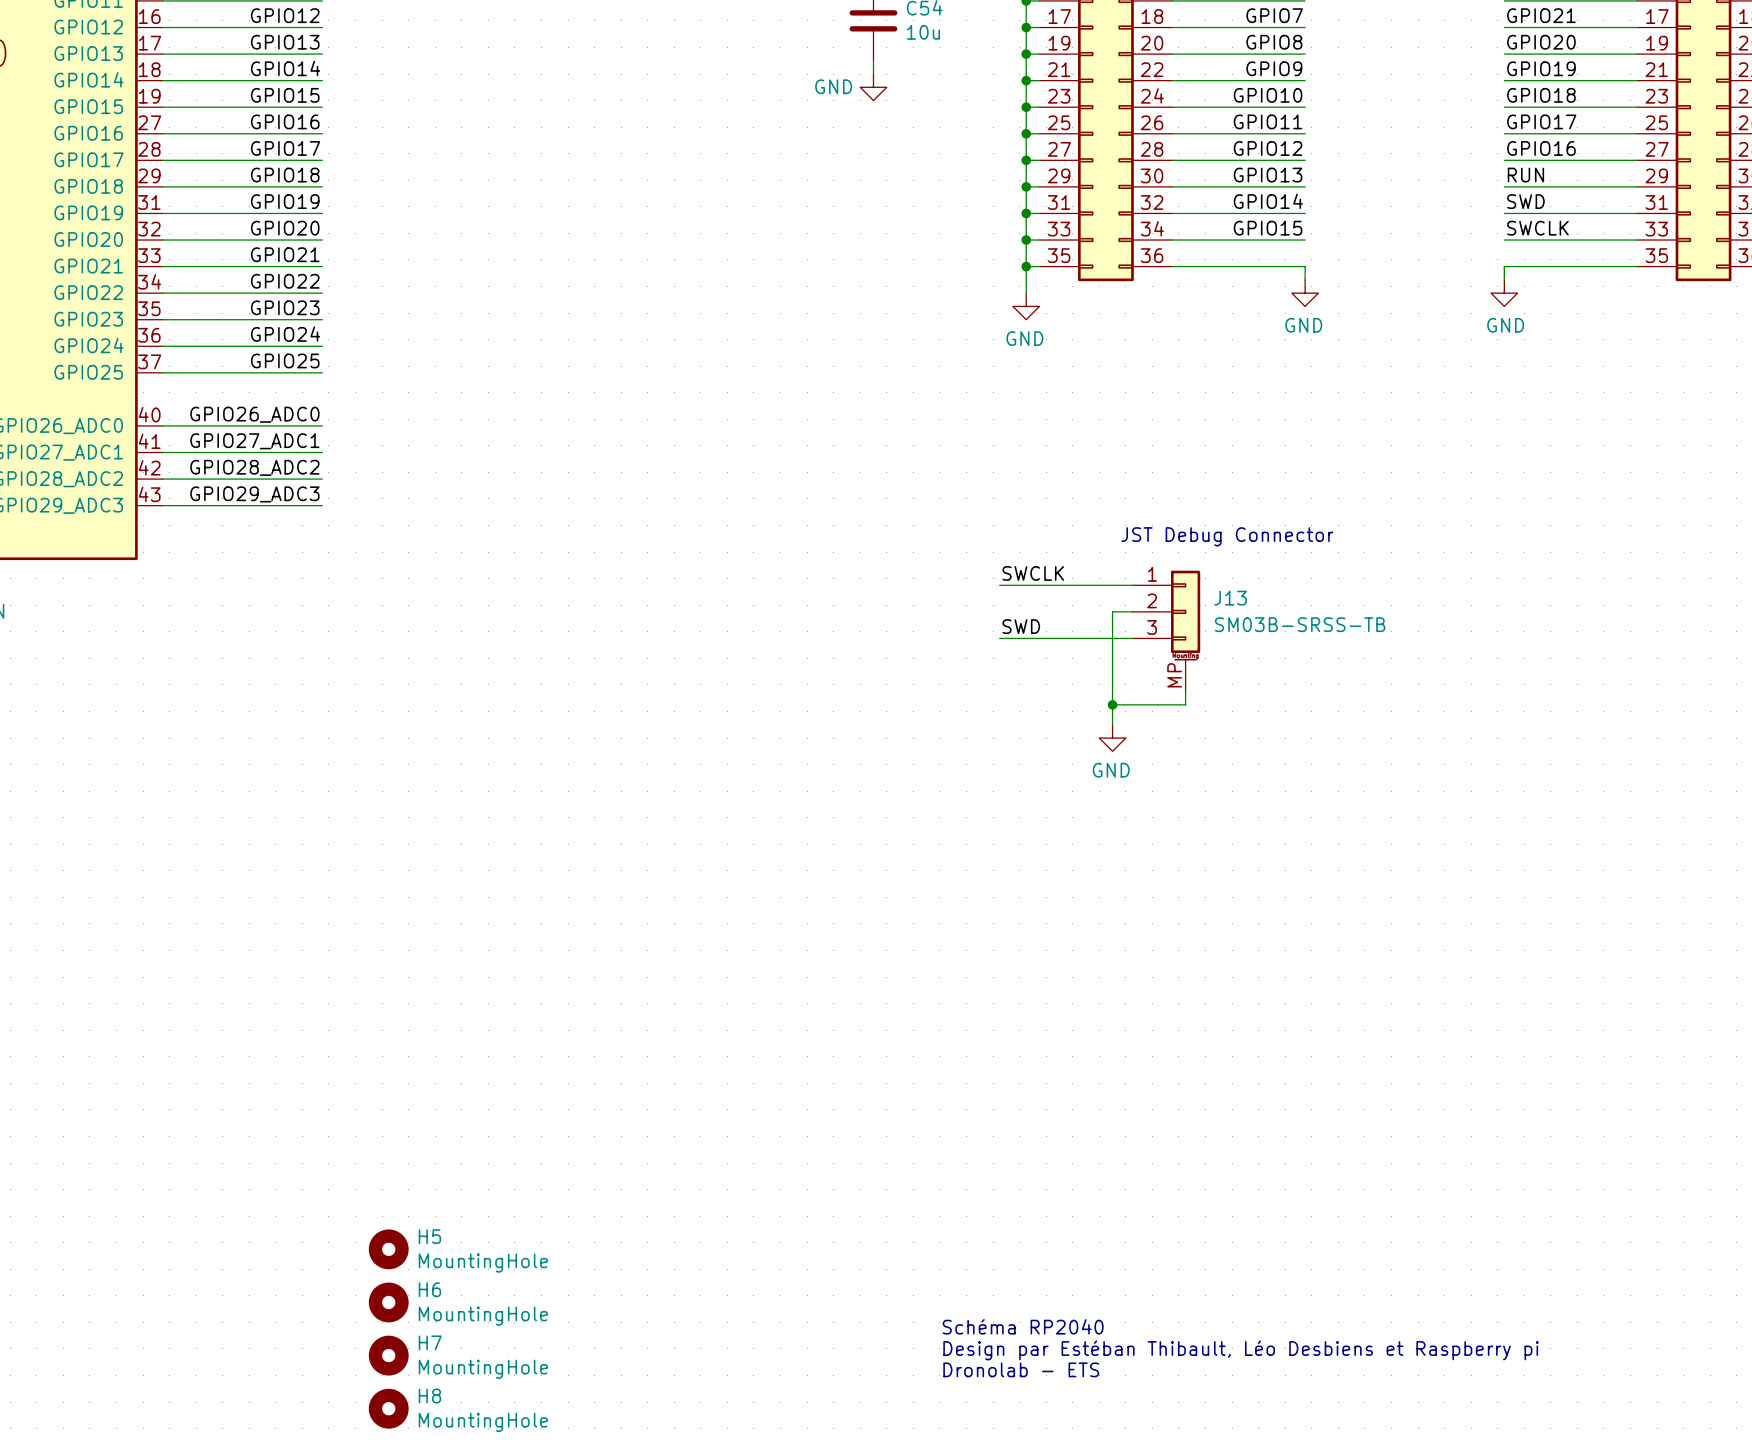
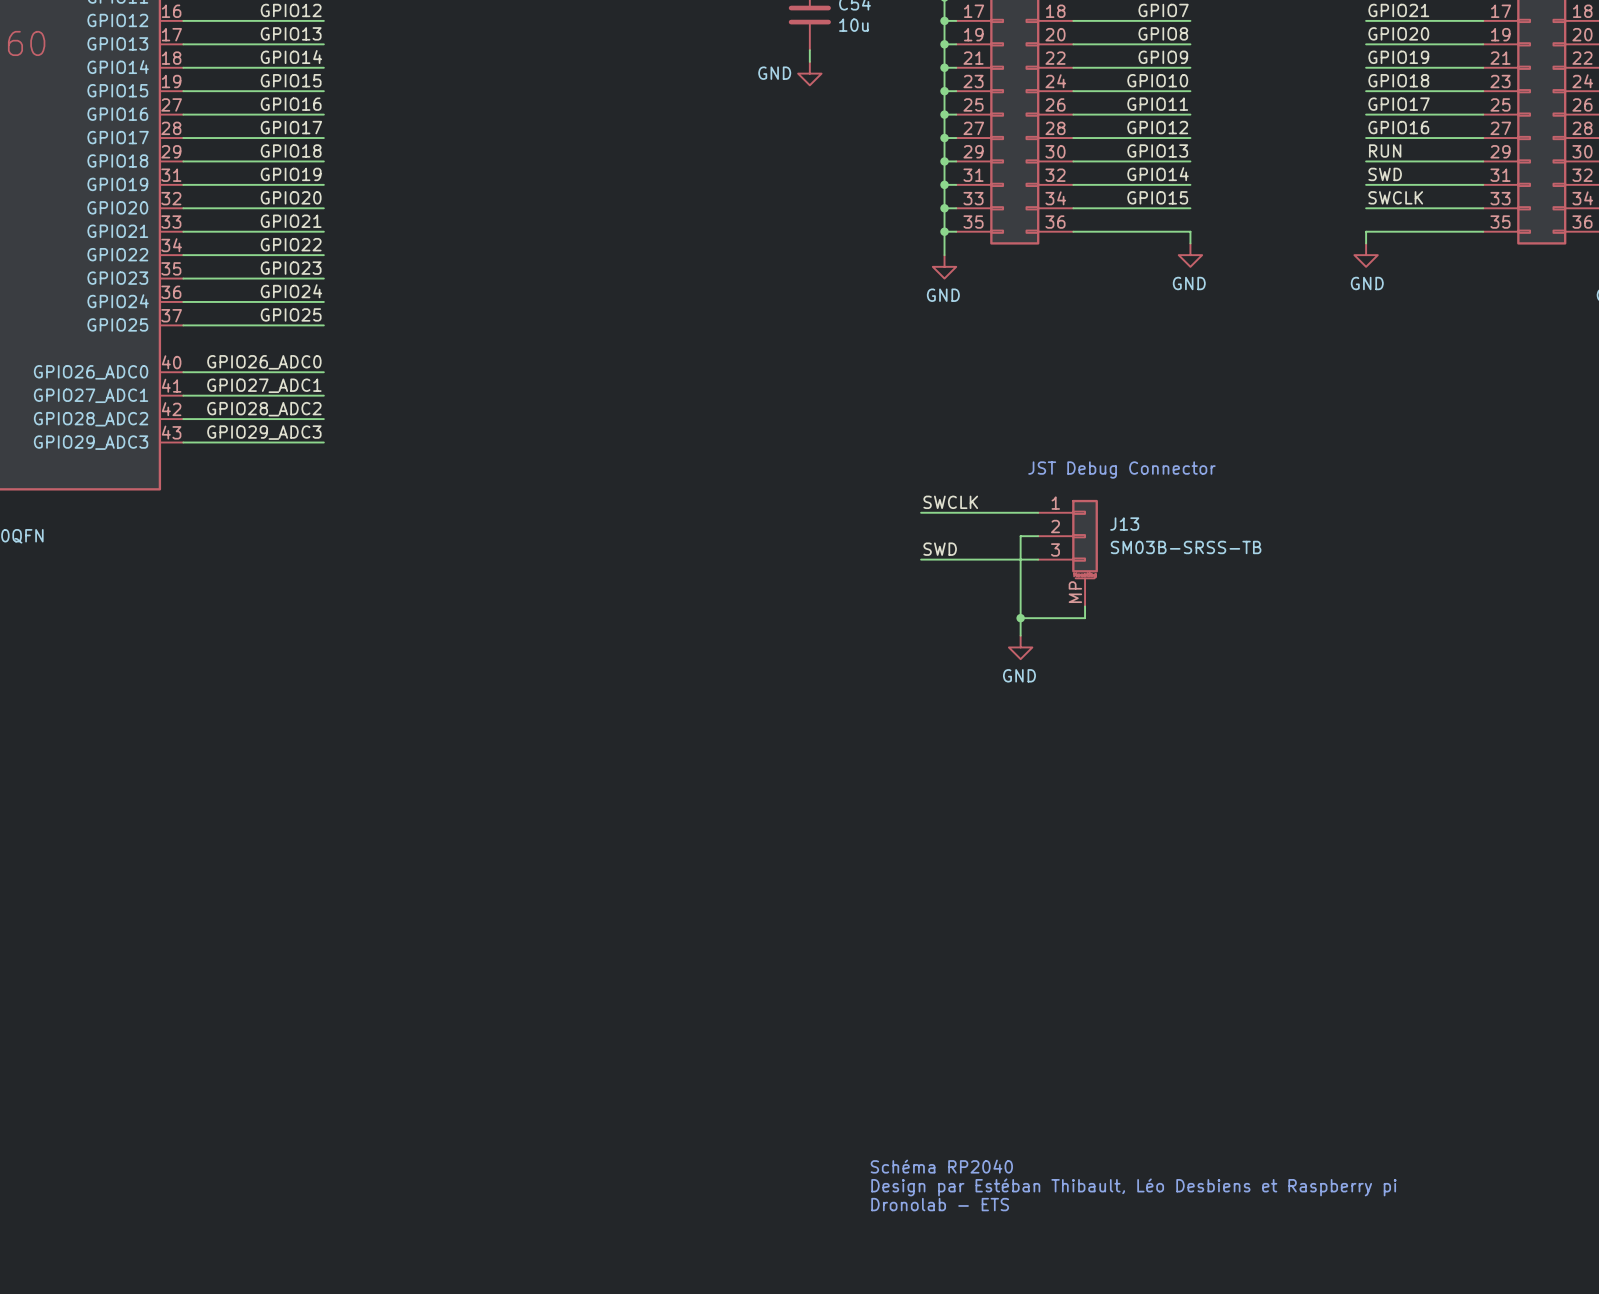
H5: MountingHole (388, 1249) -> none
H6: MountingHole (388, 1302) -> none
H7: MountingHole (388, 1355) -> none
H8: MountingHole (388, 1408) -> none

